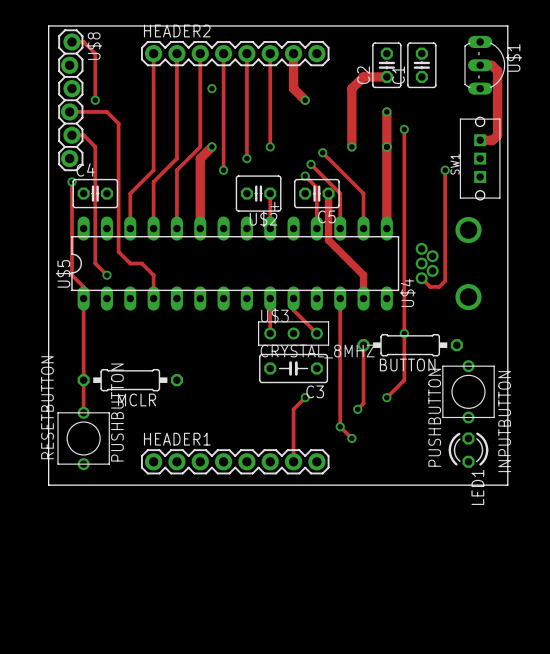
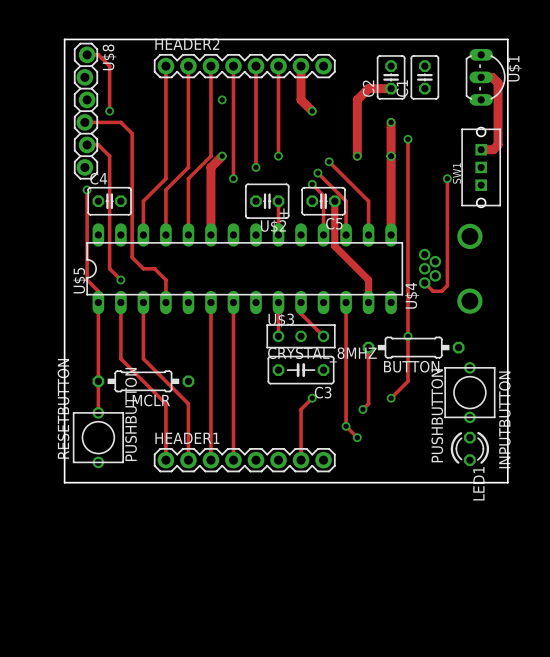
track: none -> (120, 302) (120, 358) (165, 403) (165, 460)
track: none -> (143, 302) (143, 358) (188, 403) (188, 460)
track: none -> (210, 302) (210, 460)
track: none -> (233, 302) (233, 460)

